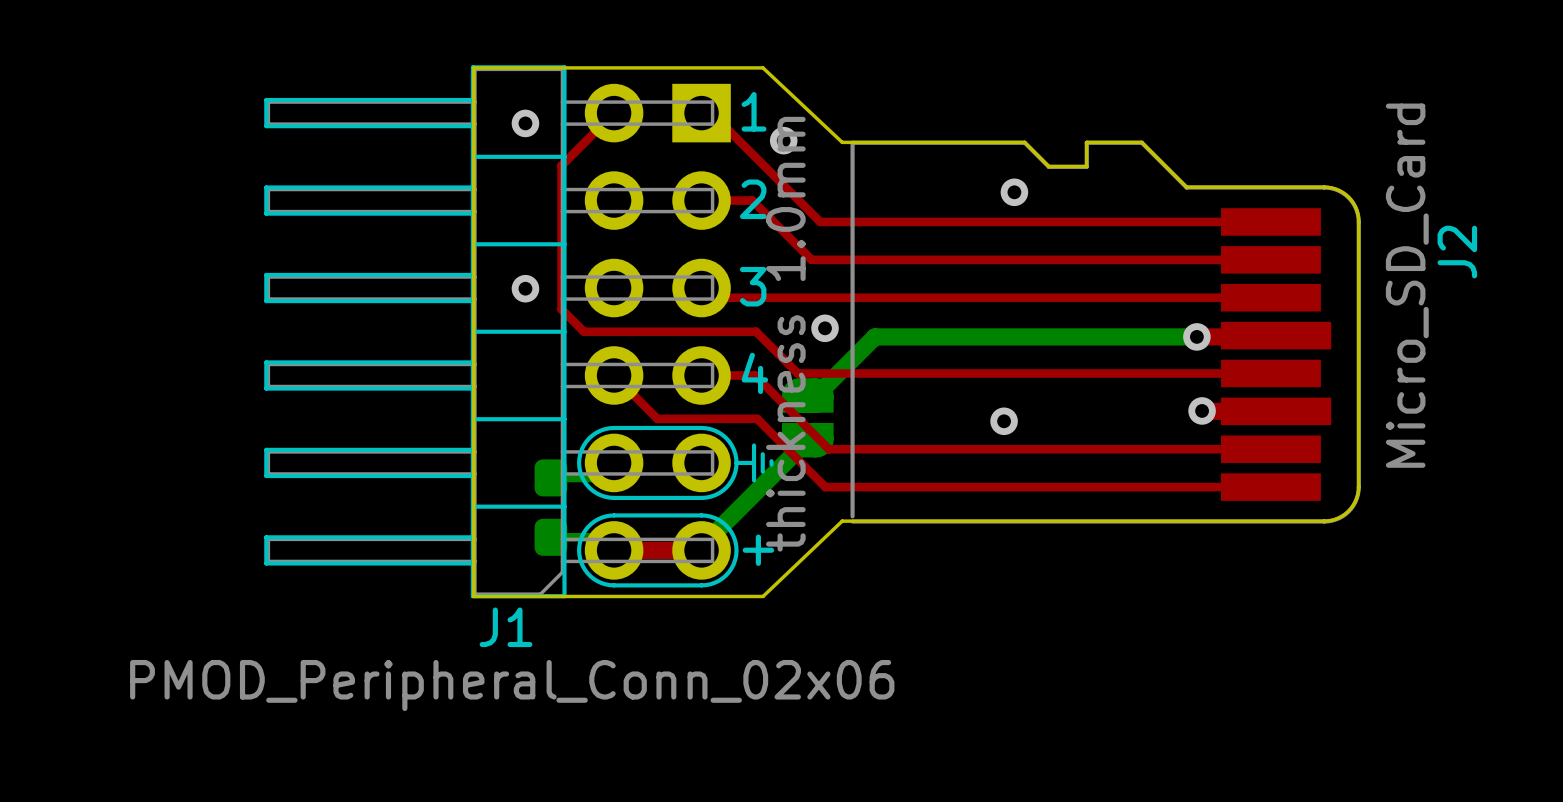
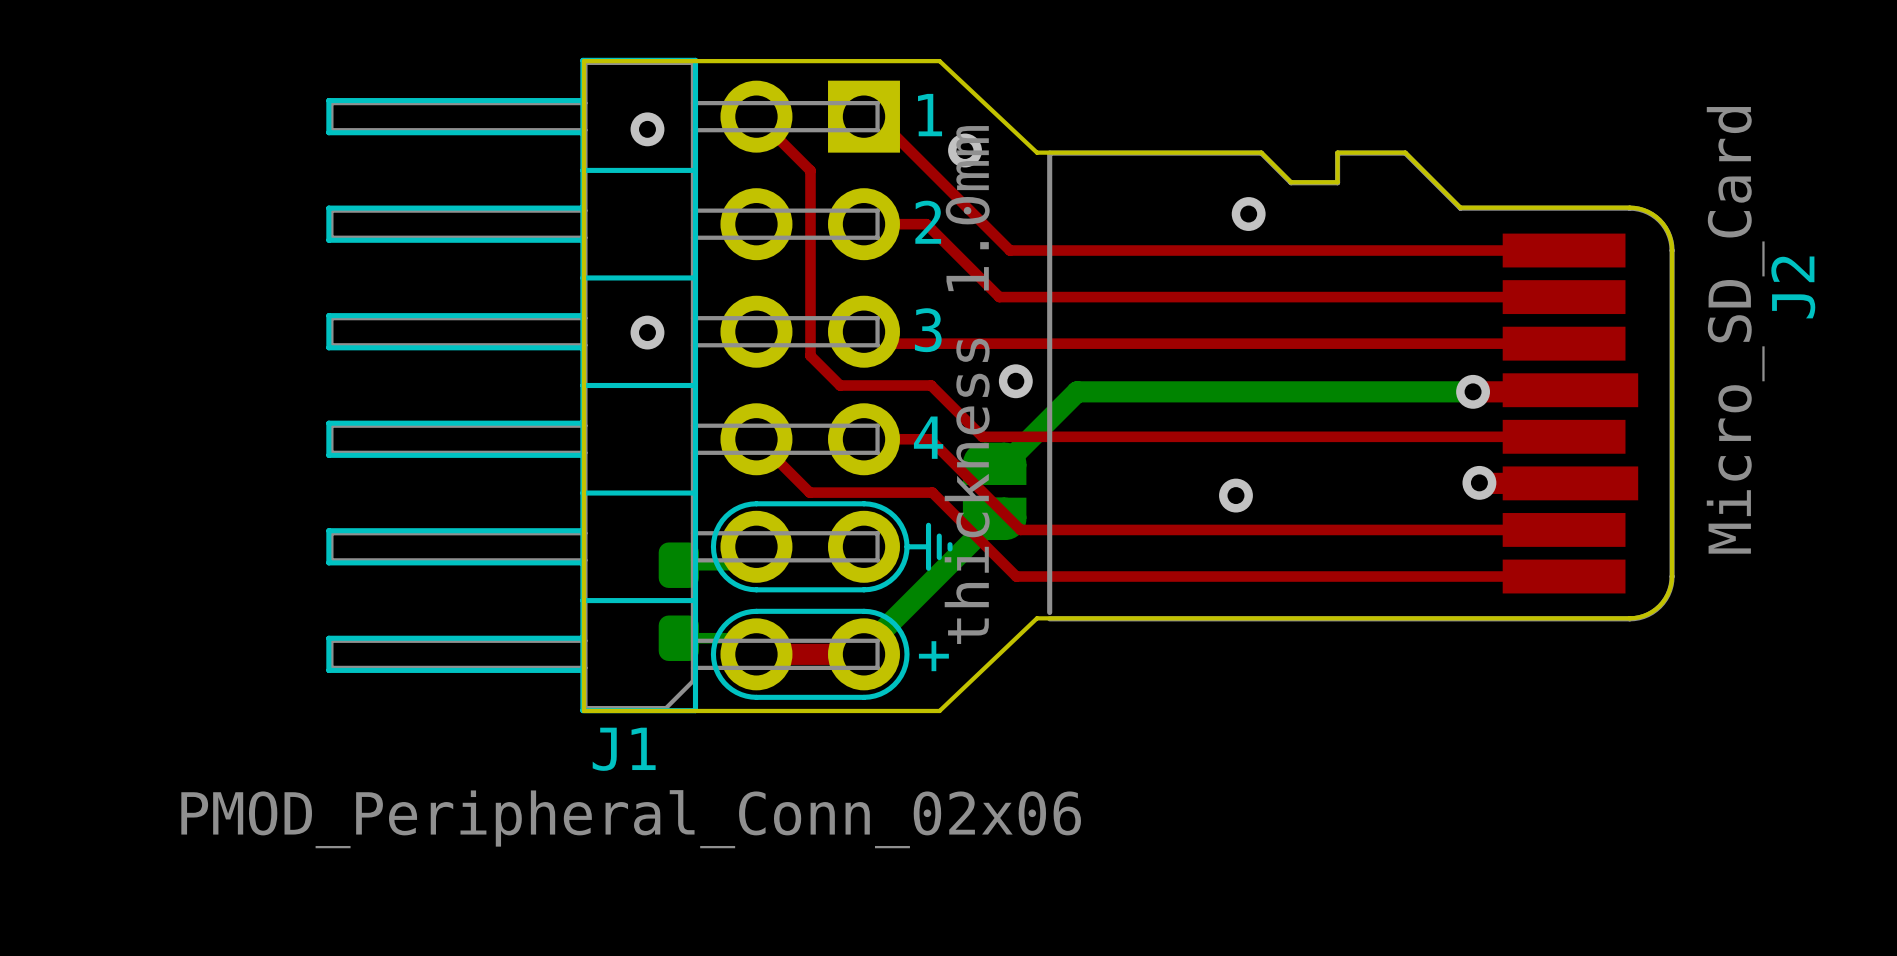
top track: (614, 113) (561, 165) (561, 309) (583, 331) (682, 331) -> (756, 116) (810, 170) (810, 355) (840, 385)

